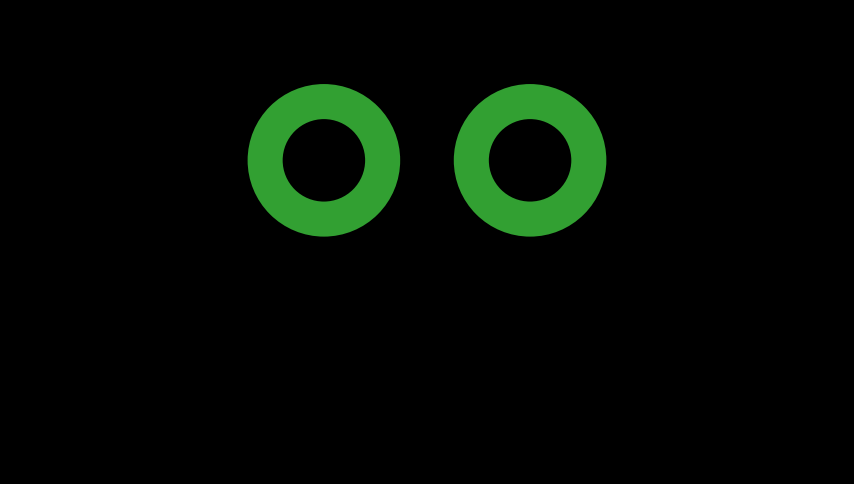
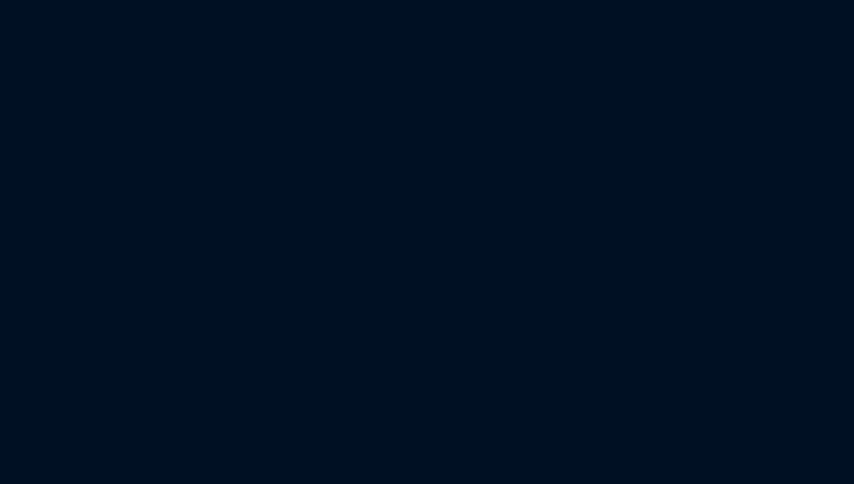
part: (426, 160) -> none

